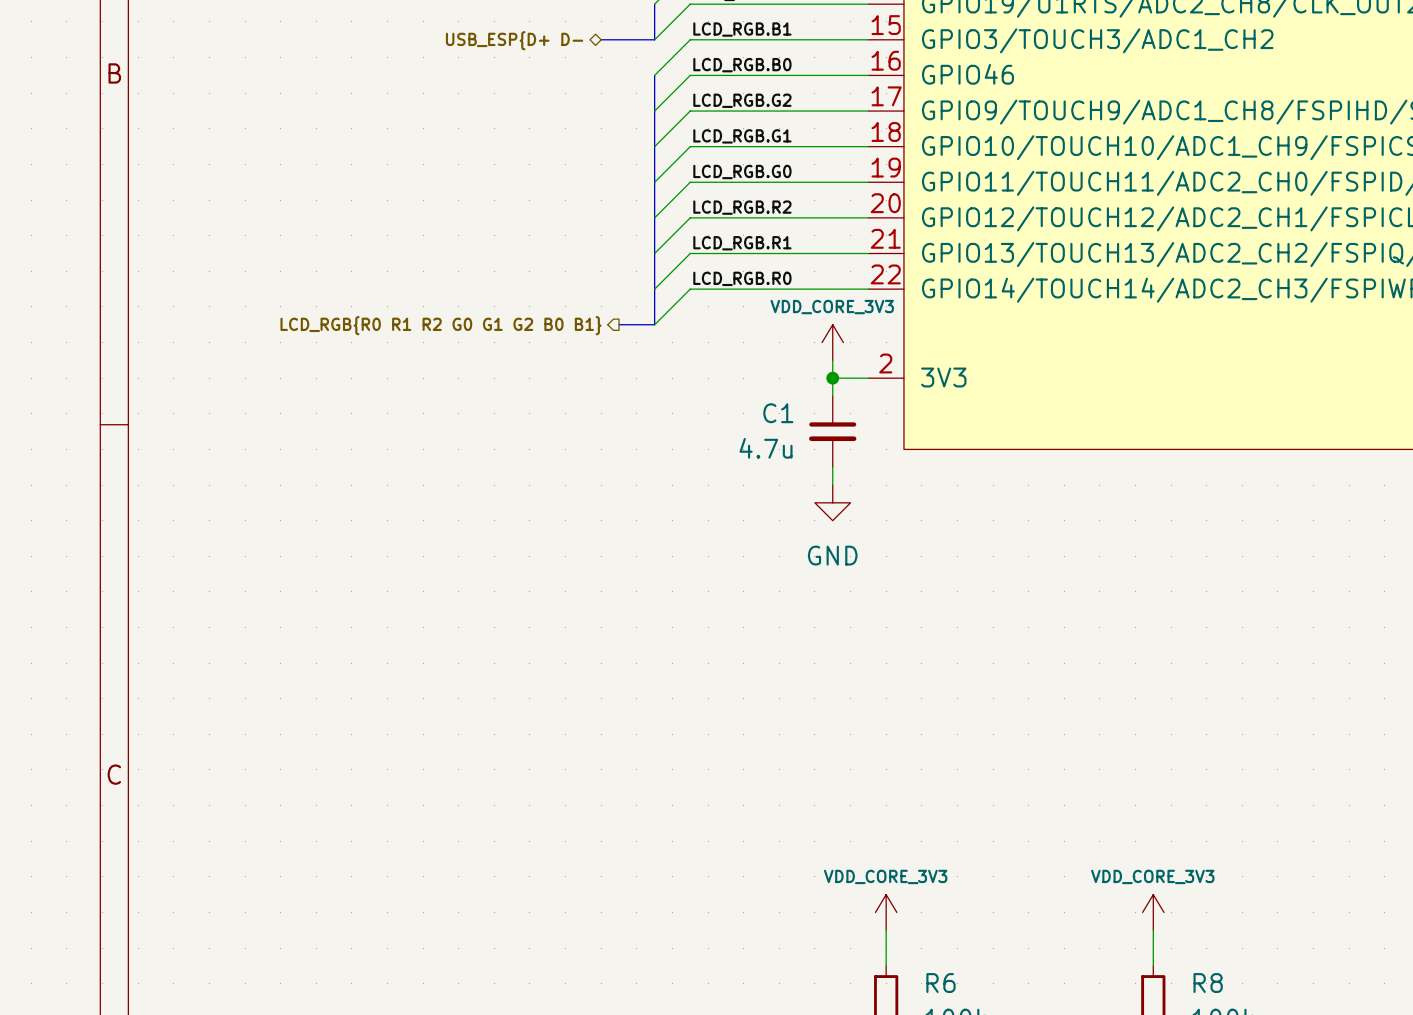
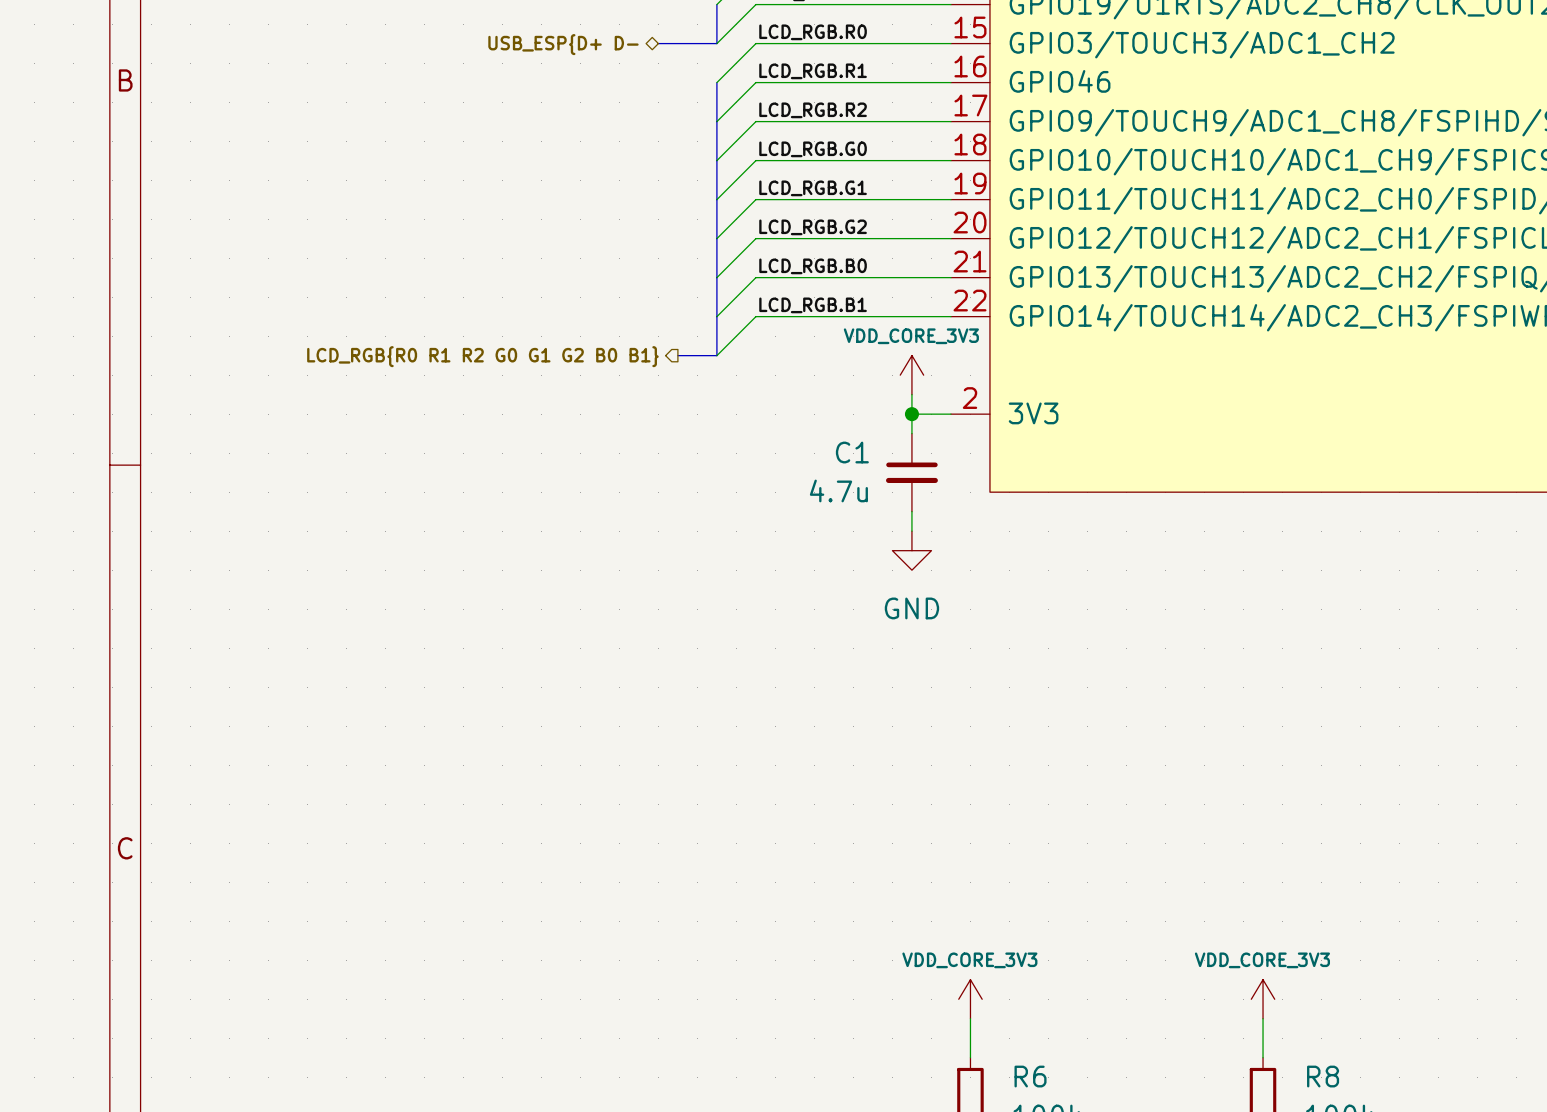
label: LCD_RGB.B1 (742, 29) -> LCD_RGB.R0 (813, 32)
label: LCD_RGB.B0 (742, 65) -> LCD_RGB.R1 (813, 71)
label: LCD_RGB.G2 (742, 100) -> LCD_RGB.R2 (813, 110)
label: LCD_RGB.G1 (742, 136) -> LCD_RGB.G0 (813, 149)
label: LCD_RGB.G0 (742, 172) -> LCD_RGB.G1 (813, 188)
label: LCD_RGB.R2 (742, 207) -> LCD_RGB.G2 (813, 227)
label: LCD_RGB.R1 (742, 243) -> LCD_RGB.B0 (813, 266)
label: LCD_RGB.R0 (742, 278) -> LCD_RGB.B1 (813, 305)

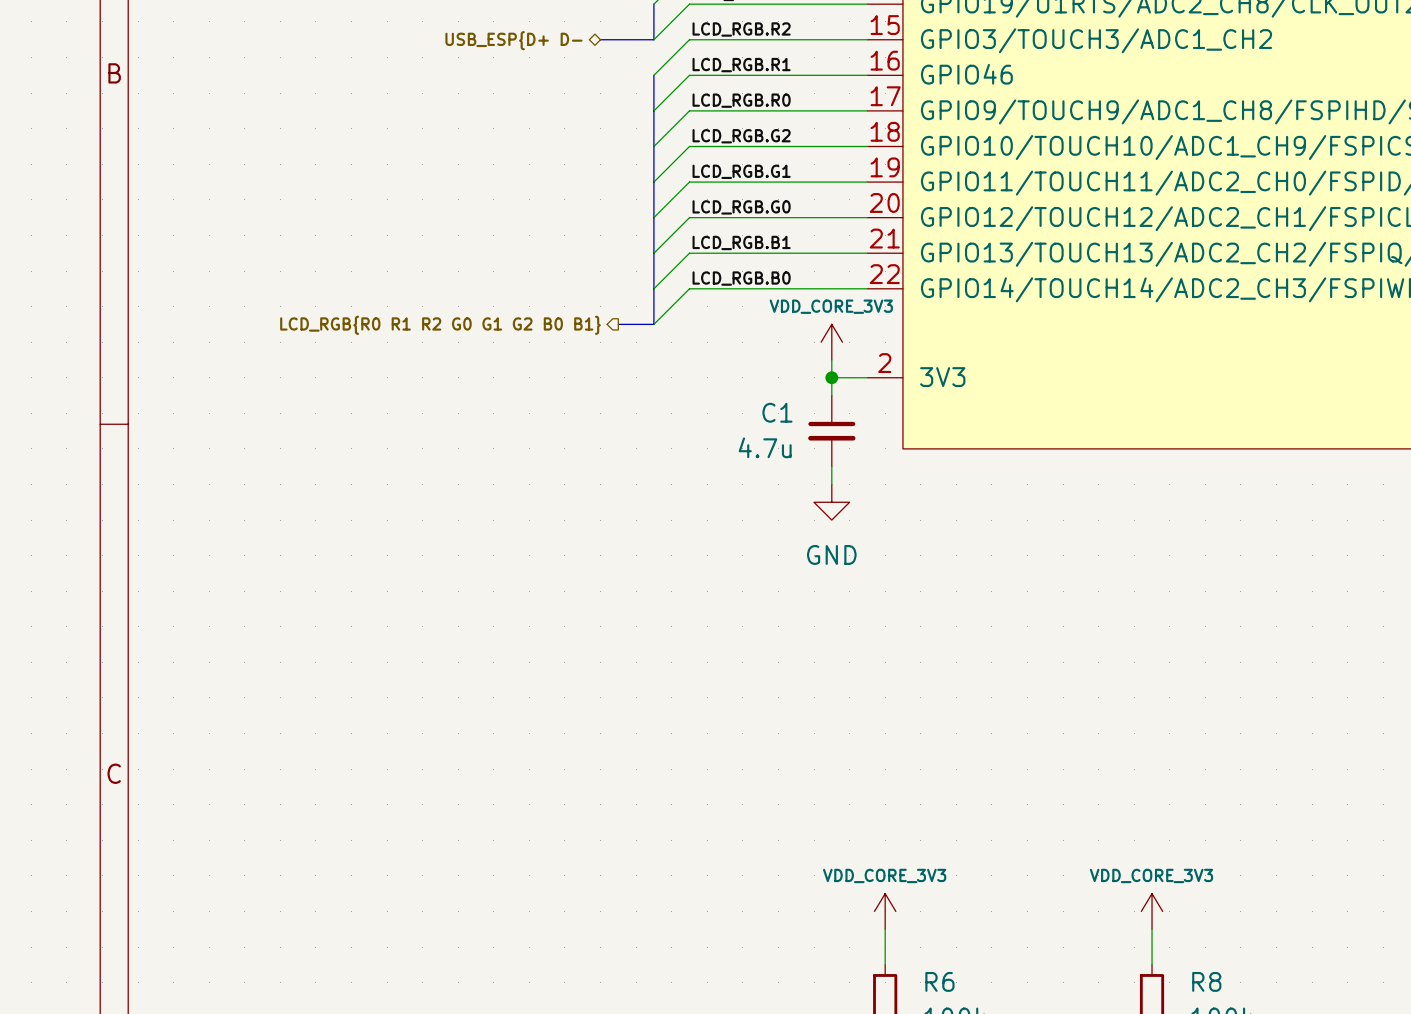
label: LCD_RGB.R0 (813, 32) -> LCD_RGB.R2 (741, 29)
label: LCD_RGB.R2 (813, 110) -> LCD_RGB.R0 (741, 100)
label: LCD_RGB.G0 (813, 149) -> LCD_RGB.G2 (741, 136)
label: LCD_RGB.G2 (813, 227) -> LCD_RGB.G0 (741, 207)
label: LCD_RGB.B0 (813, 266) -> LCD_RGB.B1 (741, 242)
label: LCD_RGB.B1 (813, 305) -> LCD_RGB.B0 (741, 278)

